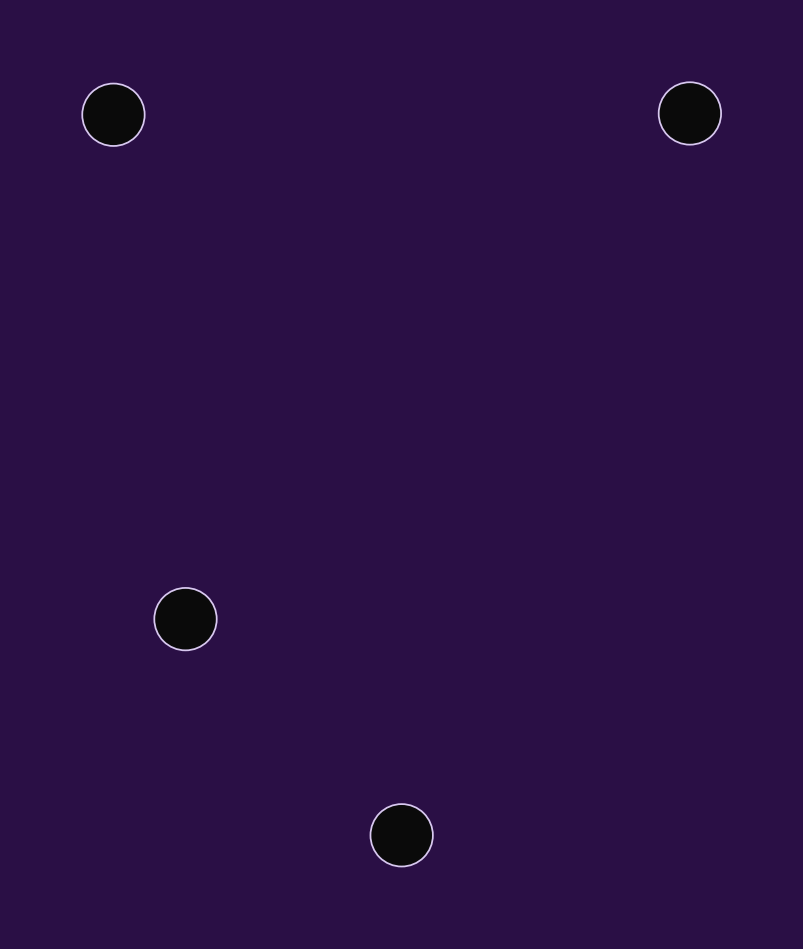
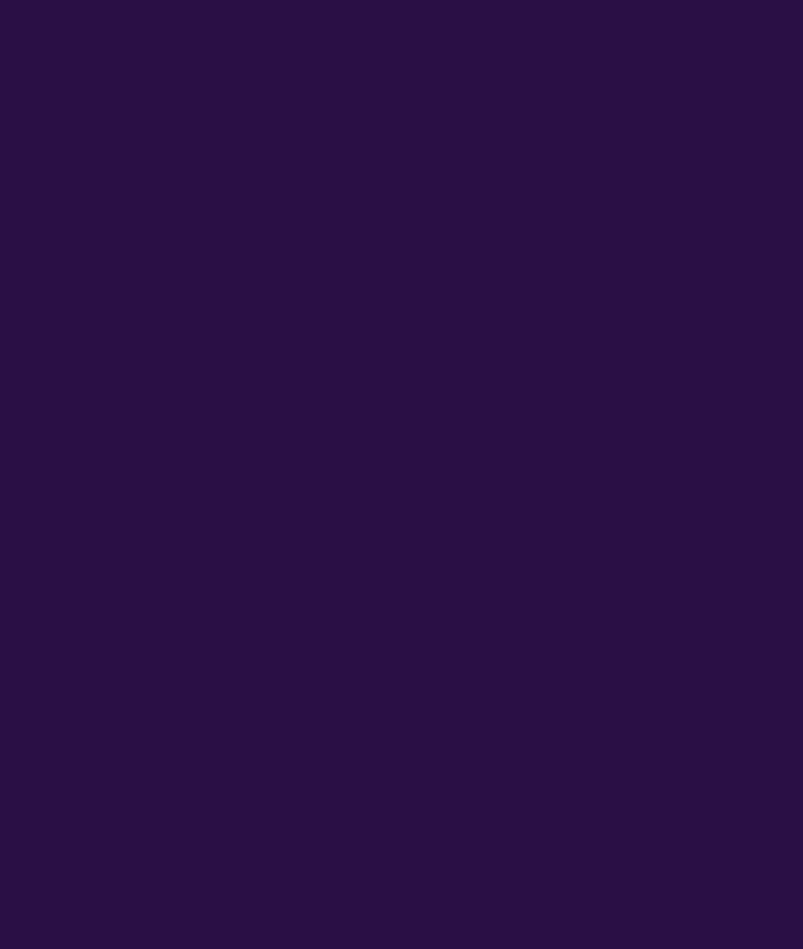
part: (689, 113) -> none
part: (113, 114) -> none
part: (185, 619) -> none
part: (401, 835) -> none

